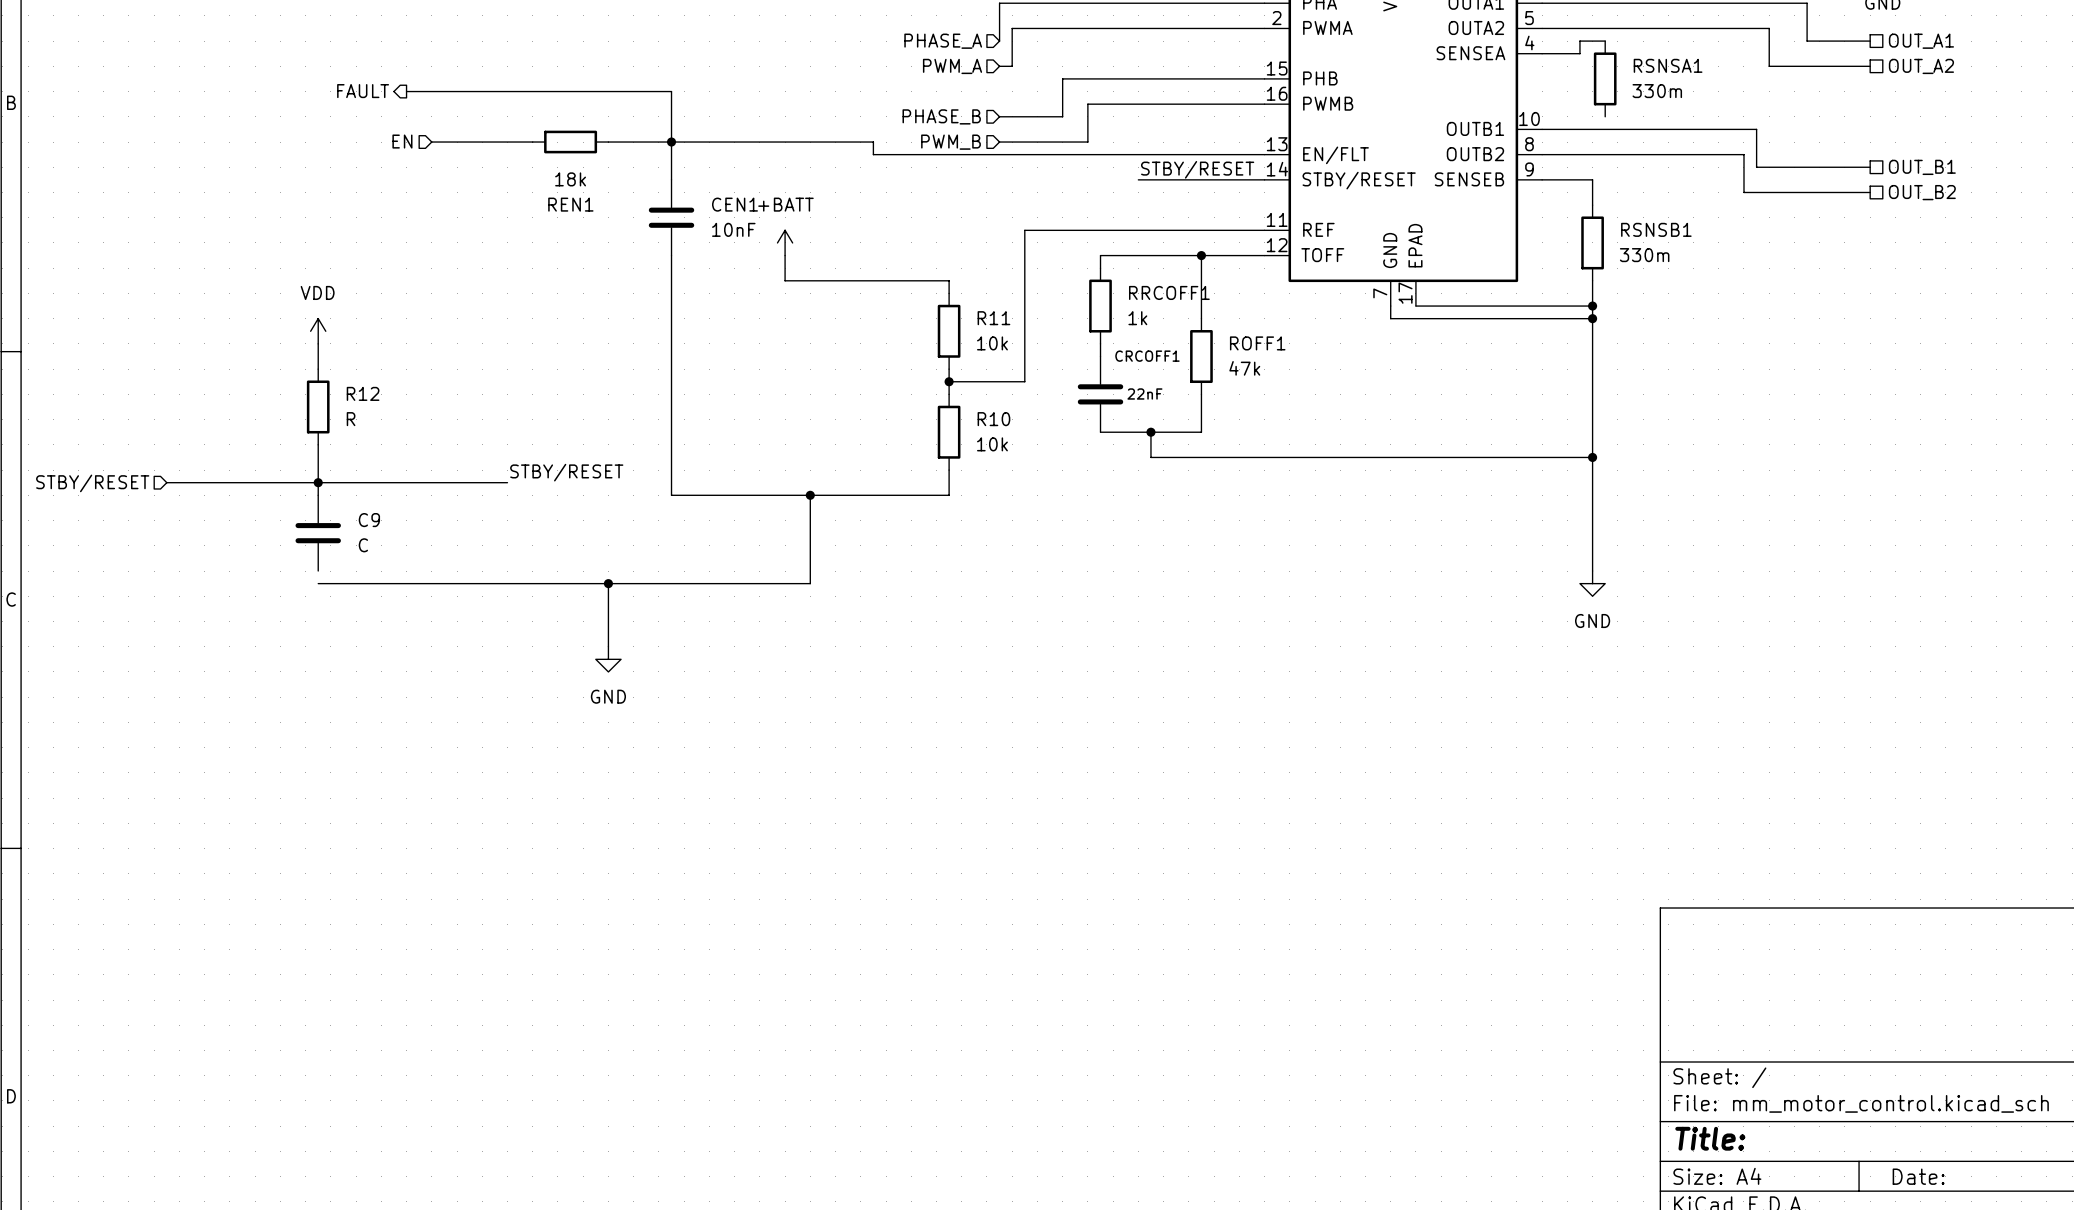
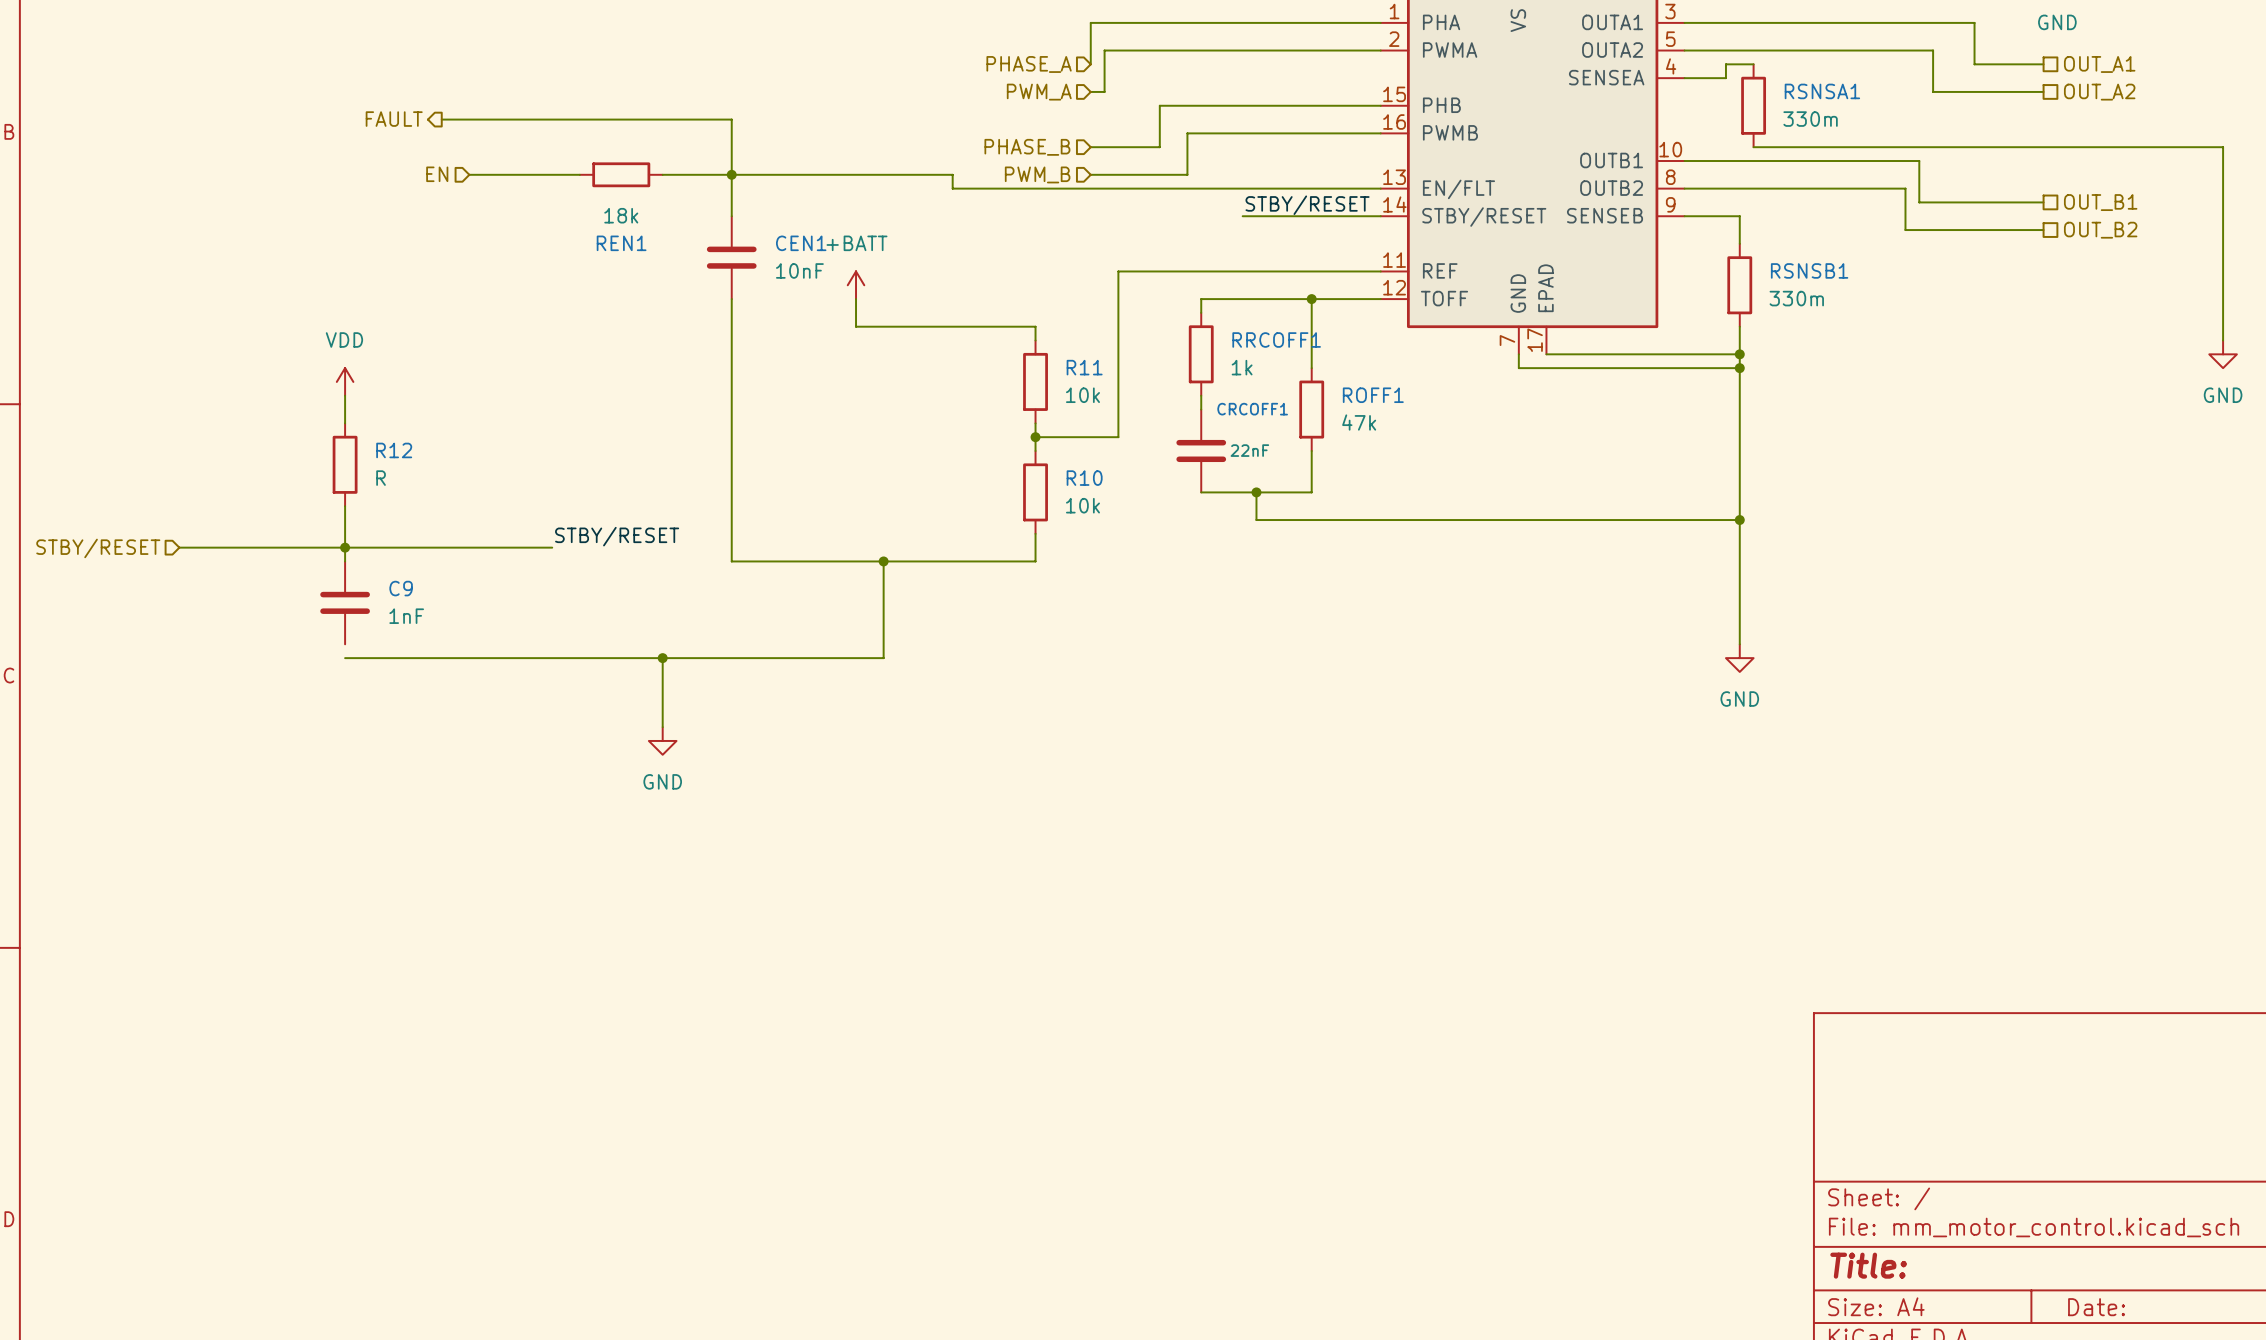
wire: none -> (1753, 147) (2223, 147) (2223, 340)
power symbol: none -> GND (2223, 354)
C9 value: C (363, 545) -> 1nF (406, 616)

